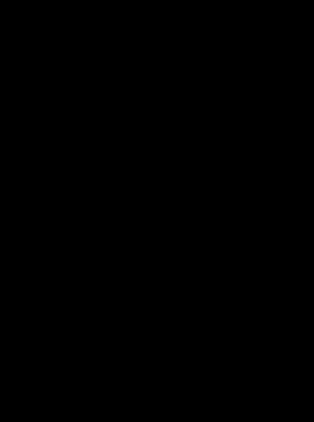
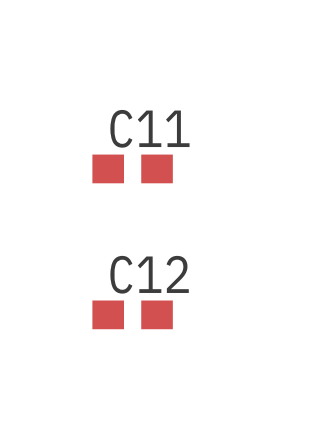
C11: none -> (132, 168)
C12: none -> (132, 314)

